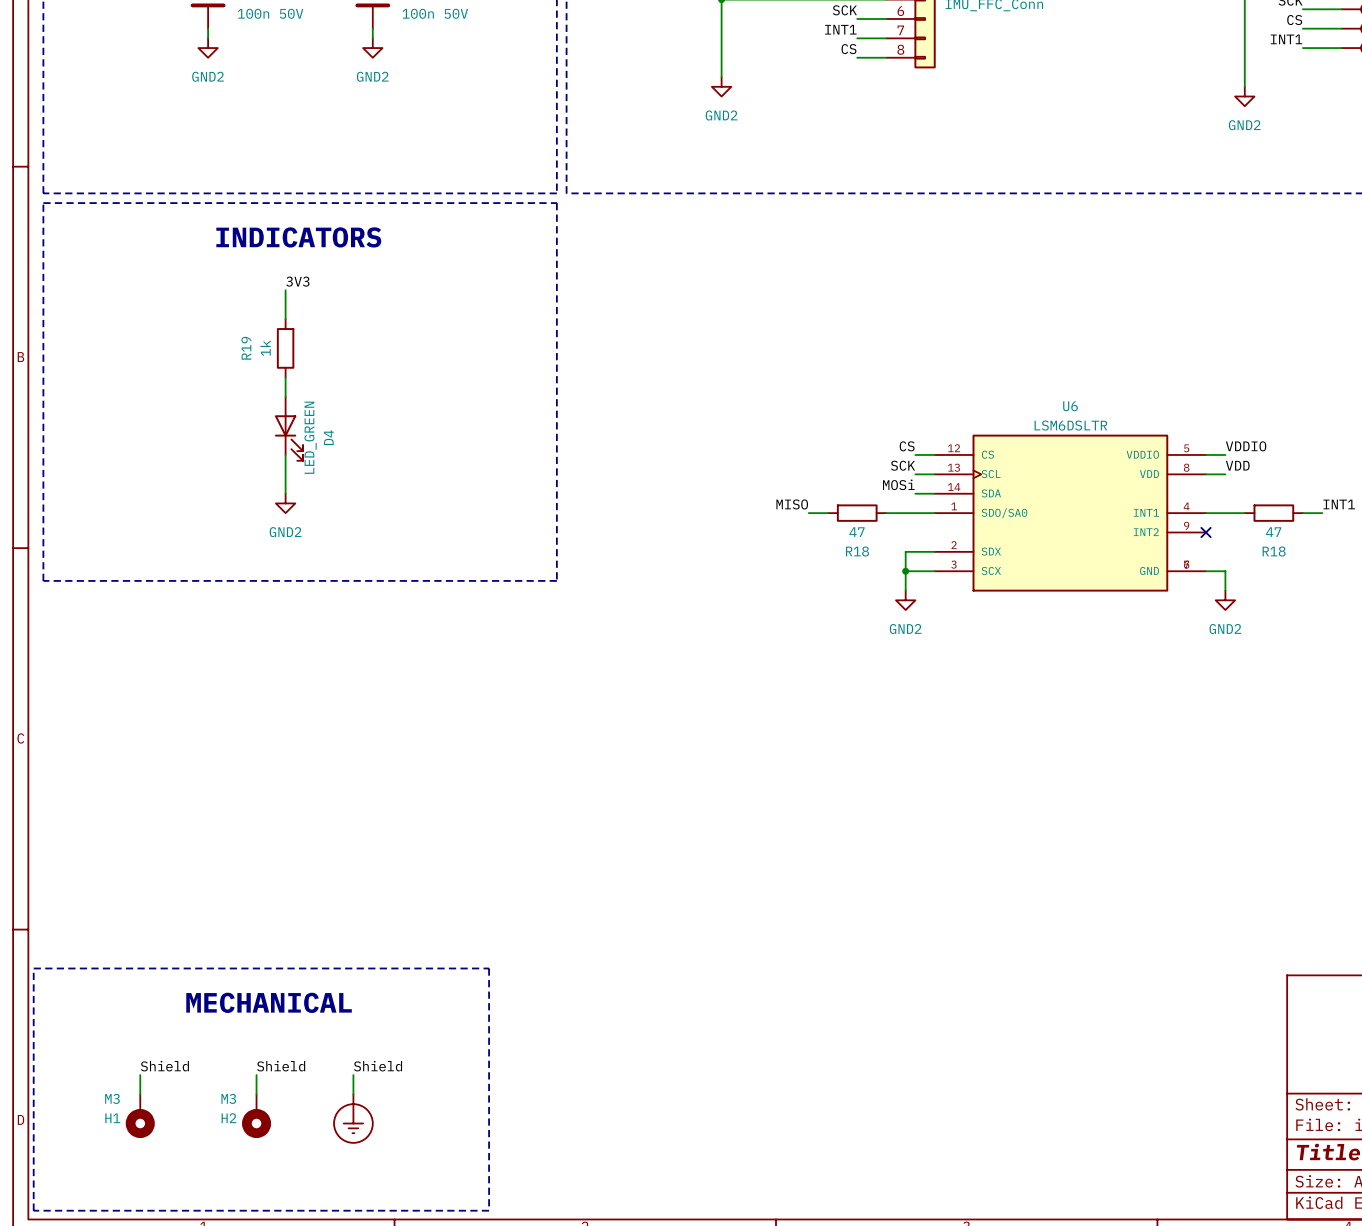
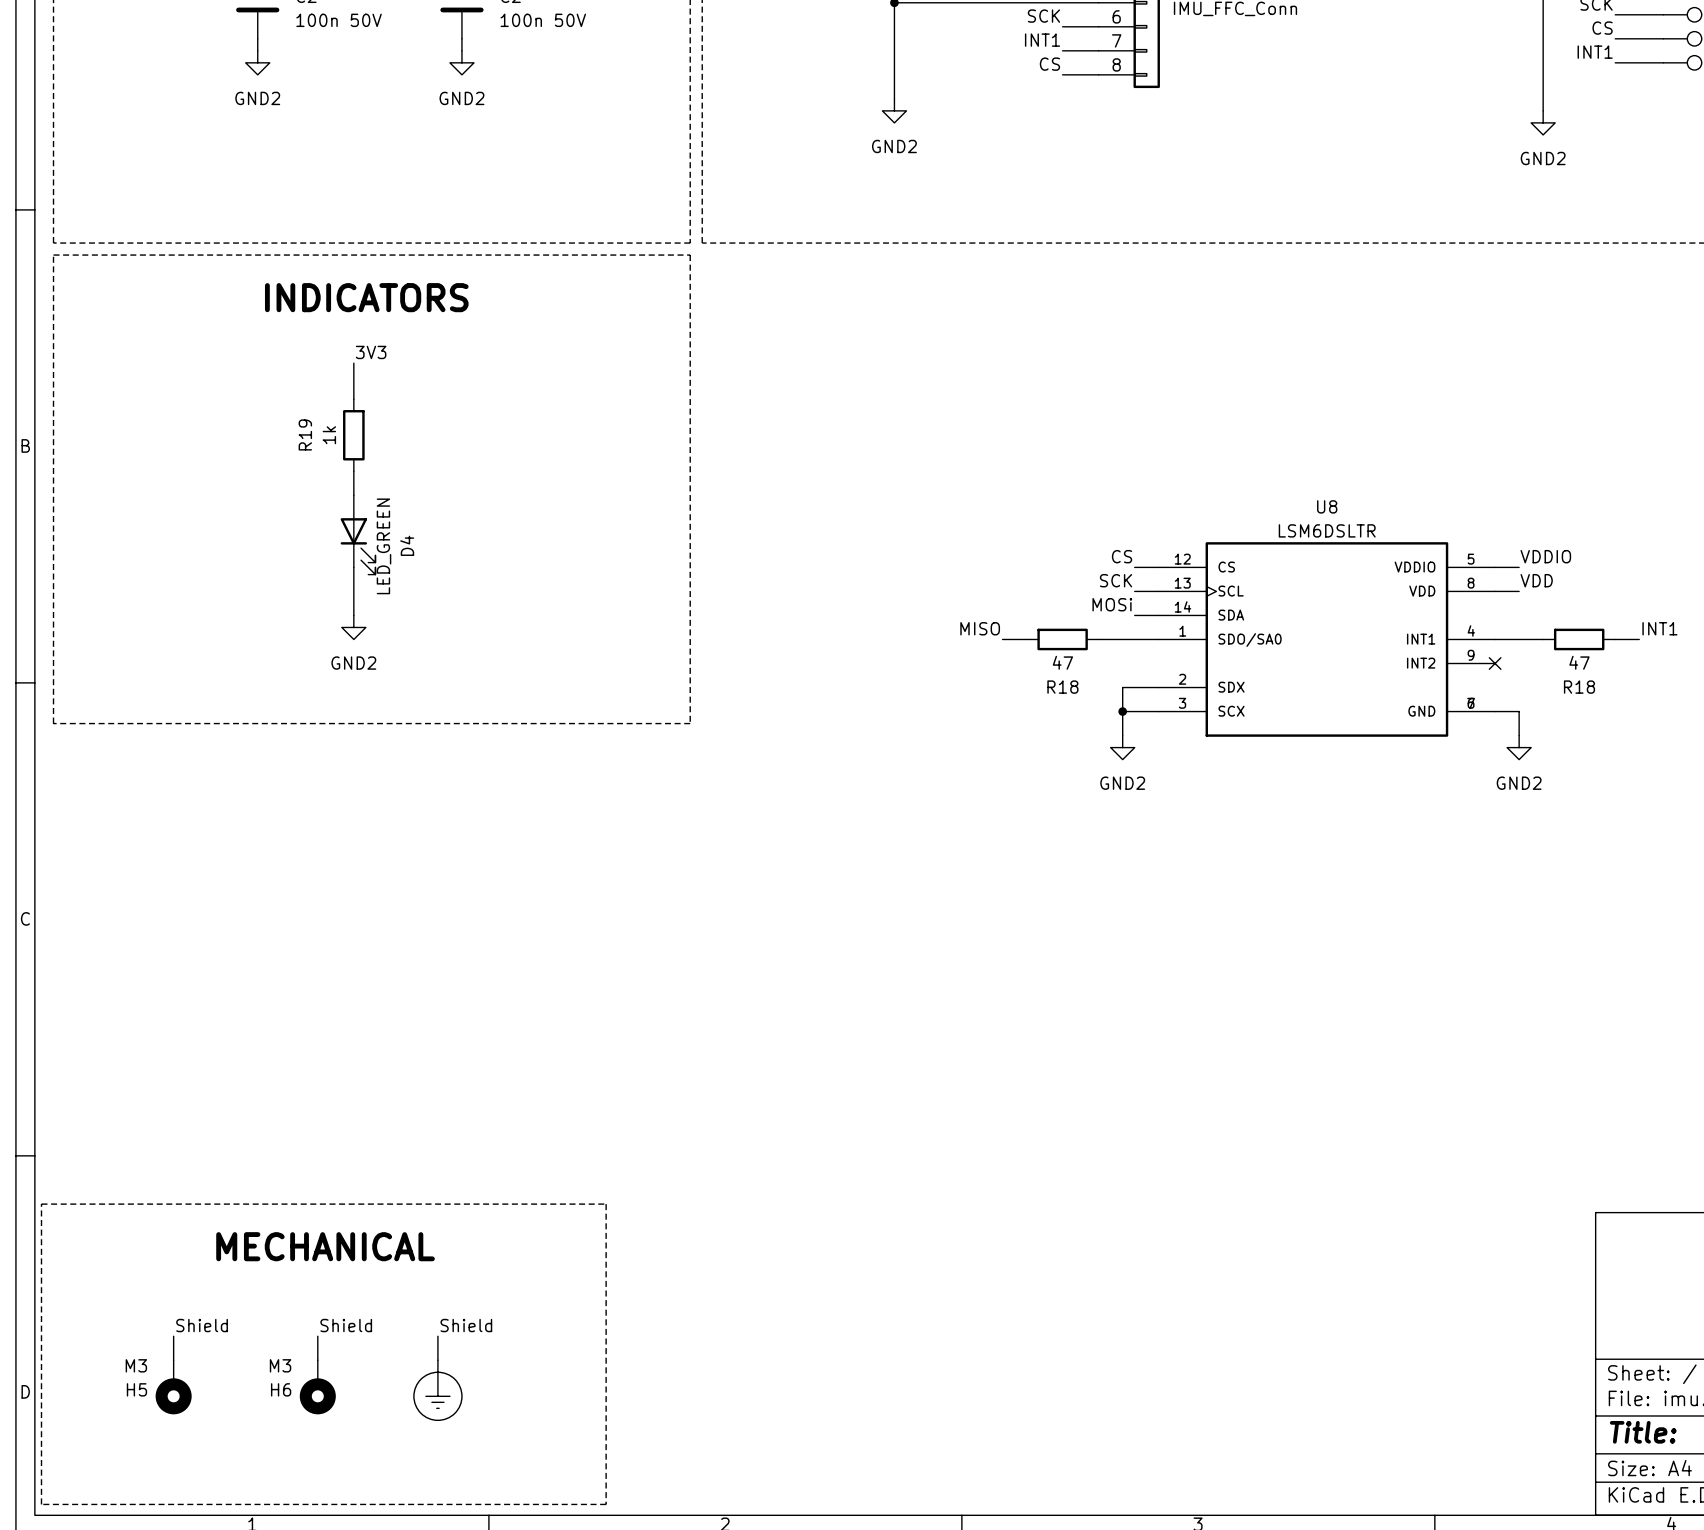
U6 name: U6 (1070, 406) -> U8 (1327, 506)
H1 name: H1 (112, 1118) -> H5 (136, 1389)
H2 name: H2 (228, 1118) -> H6 (281, 1389)

